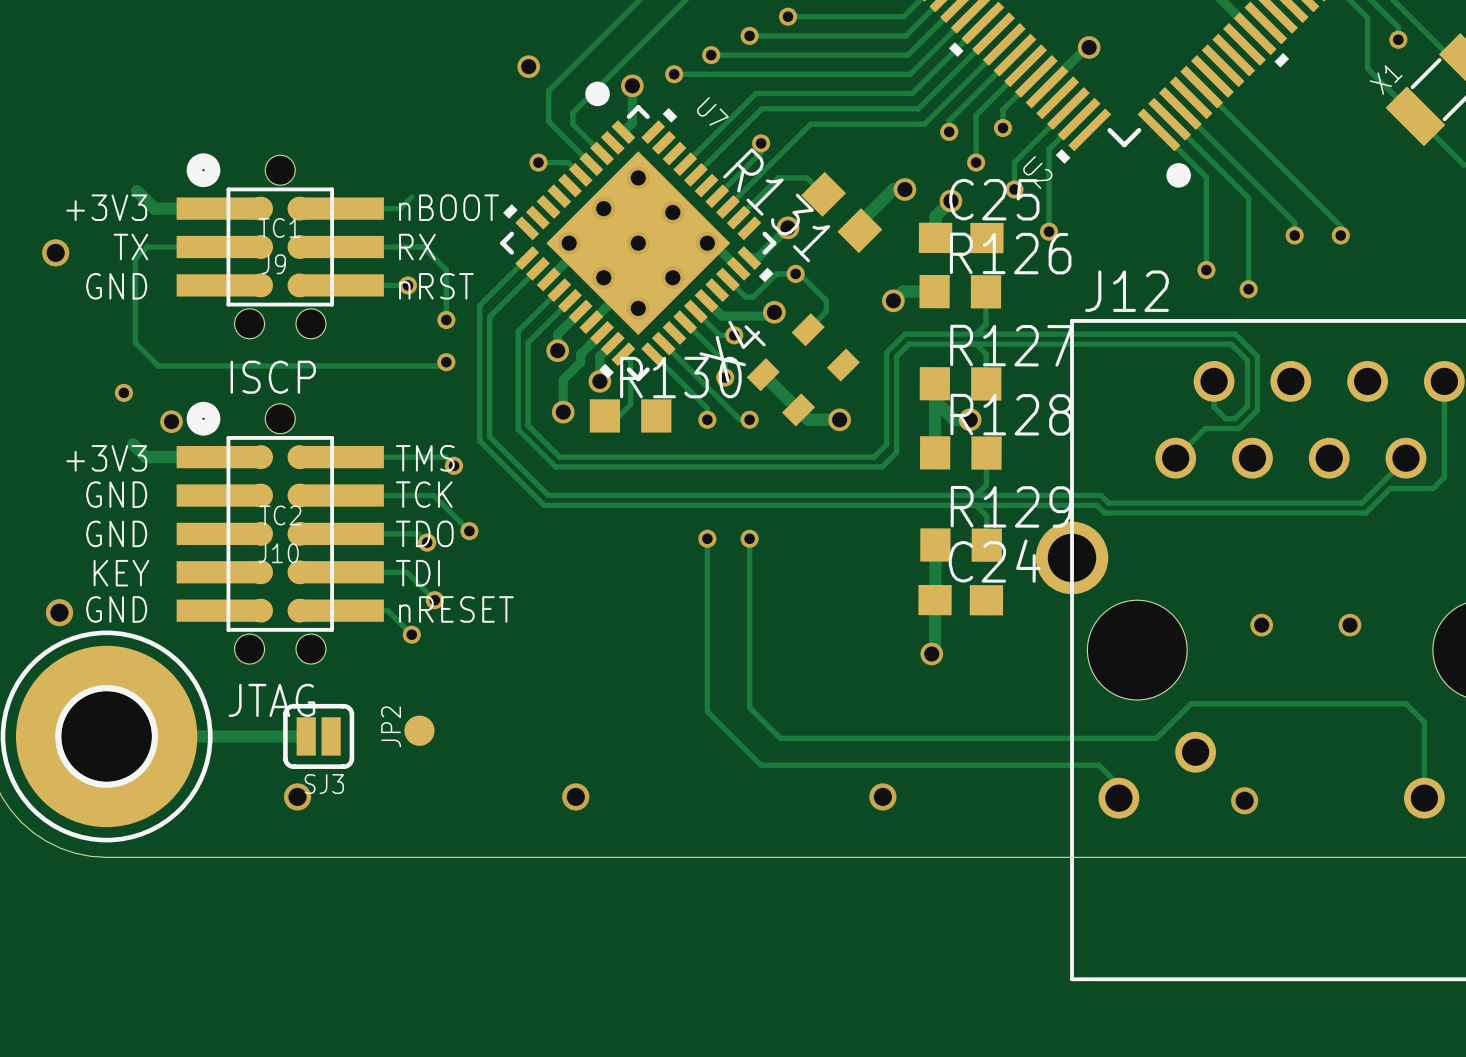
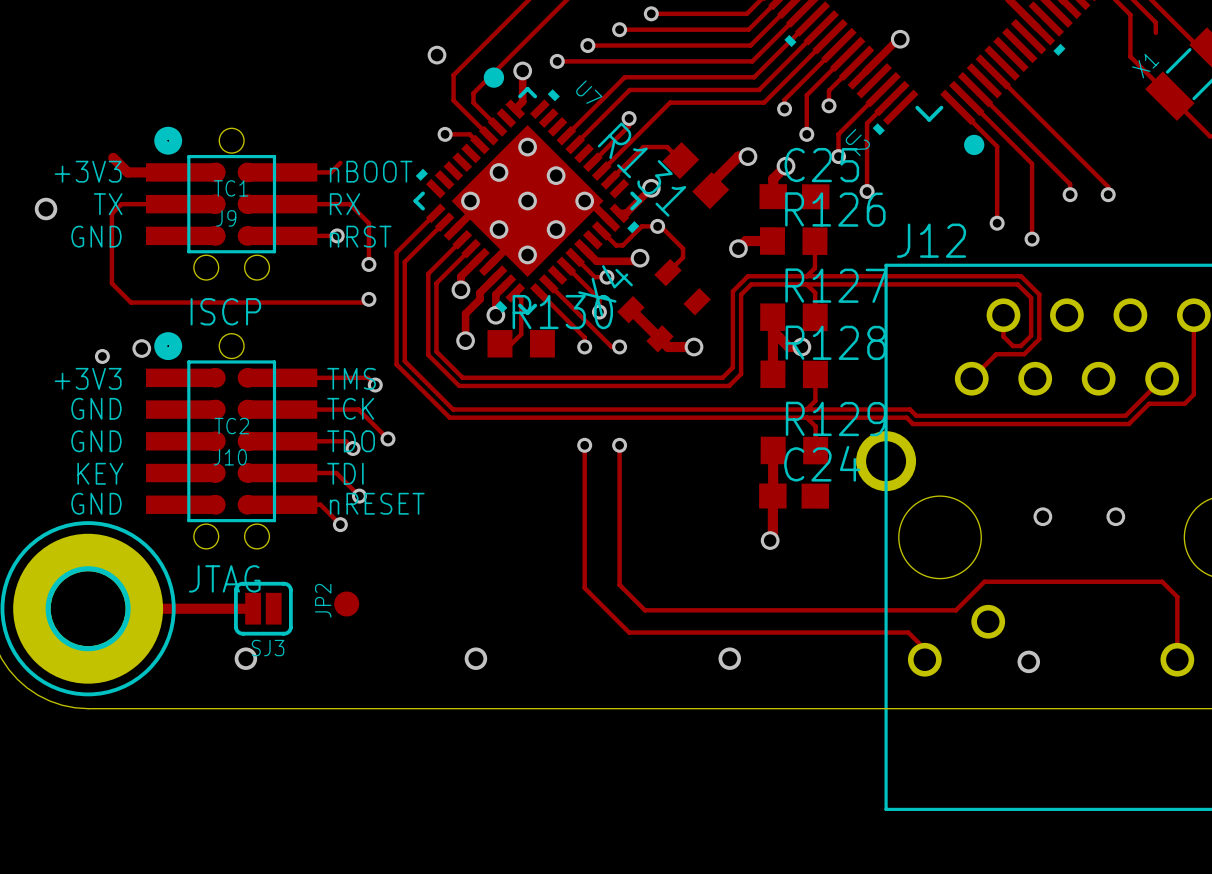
via: (1398, 39) -> none
via position: (123, 392) -> (102, 356)
track: (133, 444) (145, 457) (218, 457) -> none
via: (59, 612) -> none

